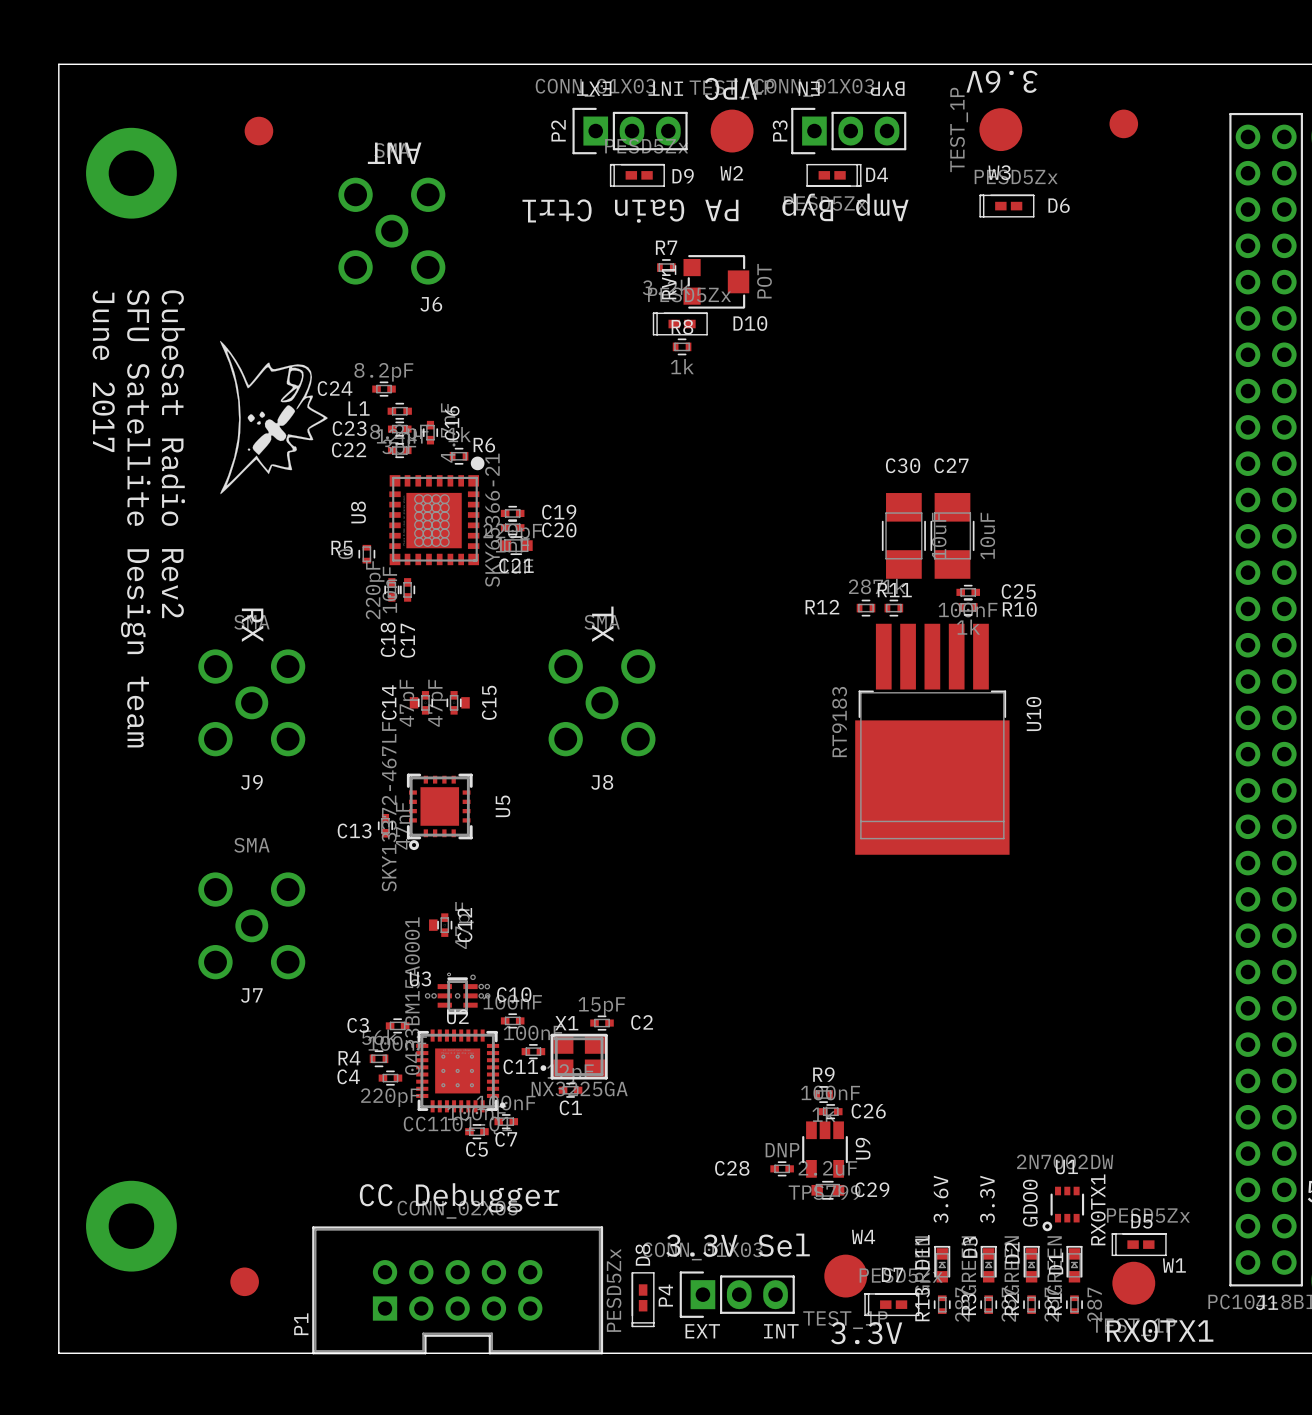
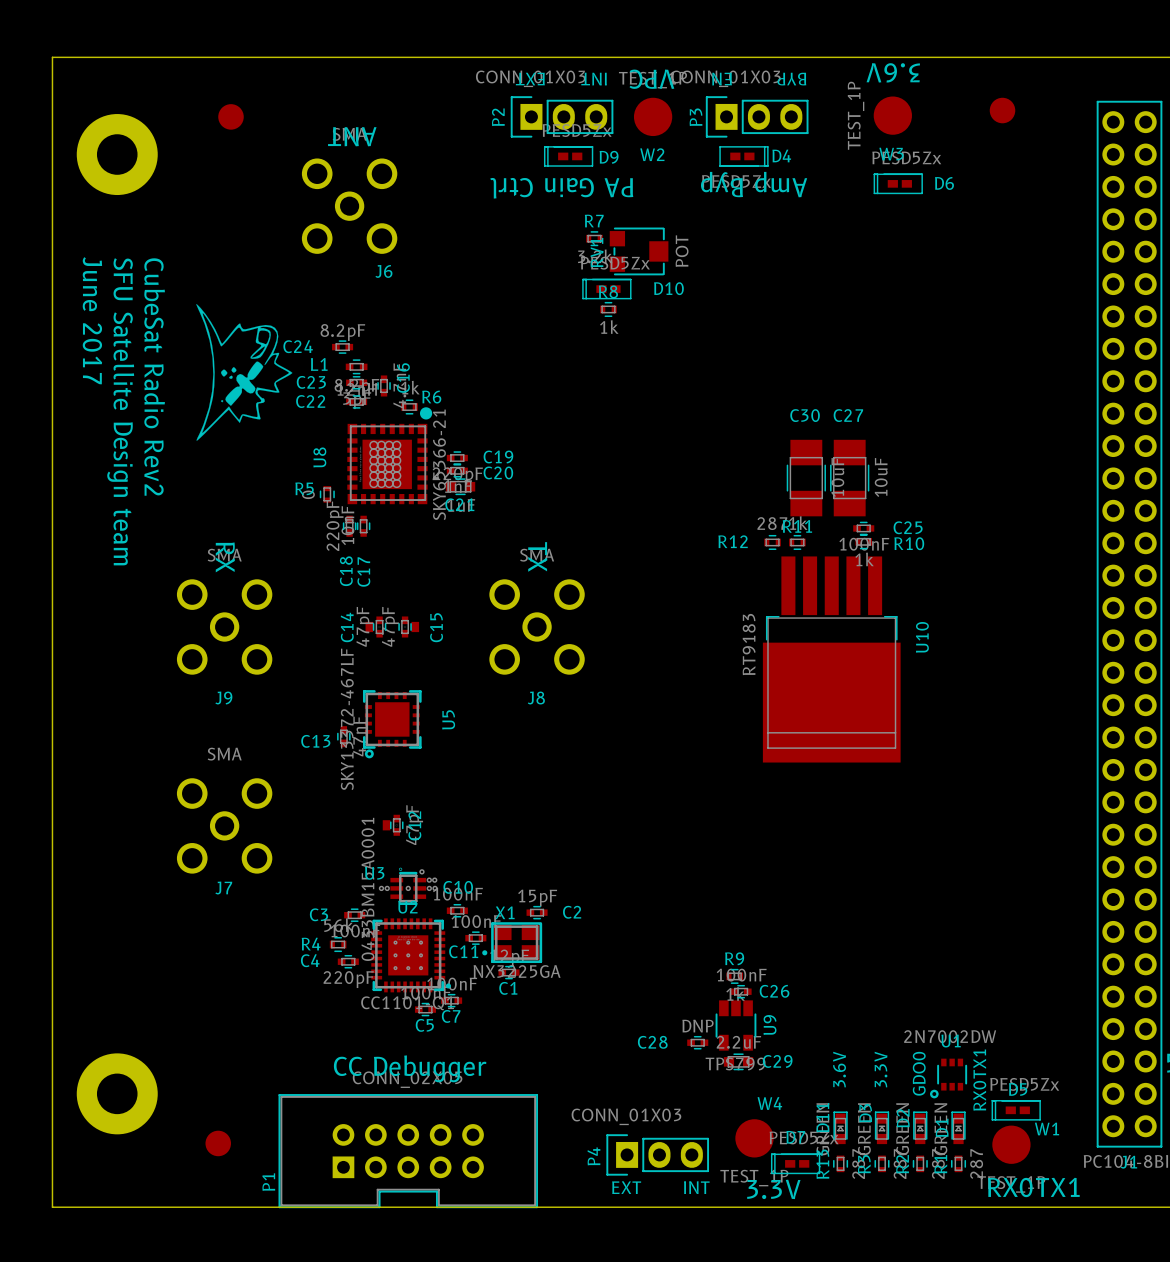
text: 3.3V Sel (738, 1245) -> none
D8: PESD5Zx (643, 1299) -> none

